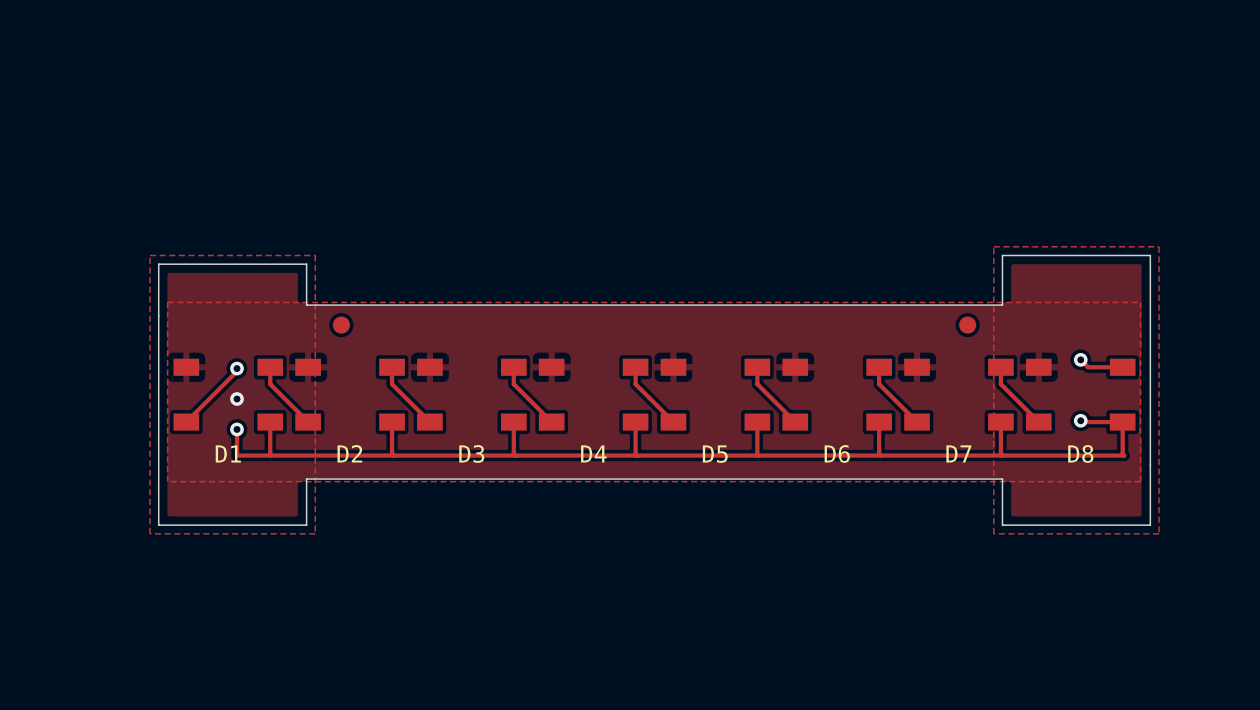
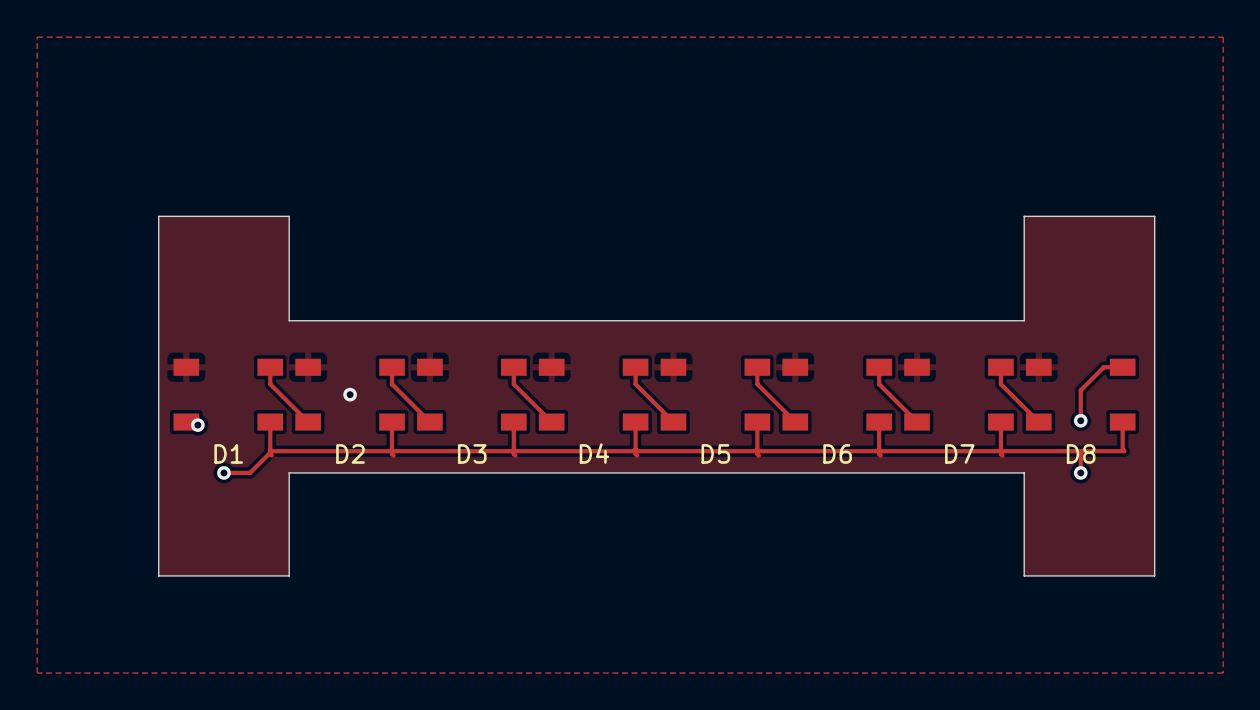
zone outline: none -> (37, 37) (37, 673) (1223, 673) (1223, 37) (37, 37)
zone outline: (993, 246) (993, 533) (1159, 533) (1159, 246) (993, 246) -> none
zone outline: (150, 255) (150, 533) (315, 533) (315, 255) (150, 255) -> none
board edge: (158, 264) (306, 264) (306, 305) (1002, 305) (1002, 255) (1150, 255) (1150, 525) (1002, 525) (1002, 479) (306, 479) (306, 525) (158, 525) -> (158, 264) (158, 216) (289, 216) (289, 320) (1024, 320) (1024, 216) (1154, 216) (1154, 575) (1024, 575) (1024, 472) (289, 472) (289, 575) (158, 575) (158, 525)
zone outline: (167, 302) (167, 481) (1140, 481) (1140, 302) (167, 302) -> none
part: (341, 325) -> none
part: (967, 325) -> none
track: (1080, 359) (1088, 367) (1103, 367) -> none
via: (1080, 359) -> none
track: (237, 368) (237, 371) (186, 422) -> none
via: (237, 368) -> none
via: none -> (350, 394)
via: (237, 399) -> none
track: (1080, 420) (1122, 422) -> (1080, 420) (1080, 390) (1103, 367)
via: none -> (197, 425)
track: (237, 429) (237, 455) (1124, 455) (1122, 449) -> (223, 472) (250, 472) (271, 451) (1124, 451) (1122, 449)
via: (237, 429) -> none
track: none -> (1080, 451) (1080, 472)
via: none -> (223, 472)
via: none -> (1080, 472)

